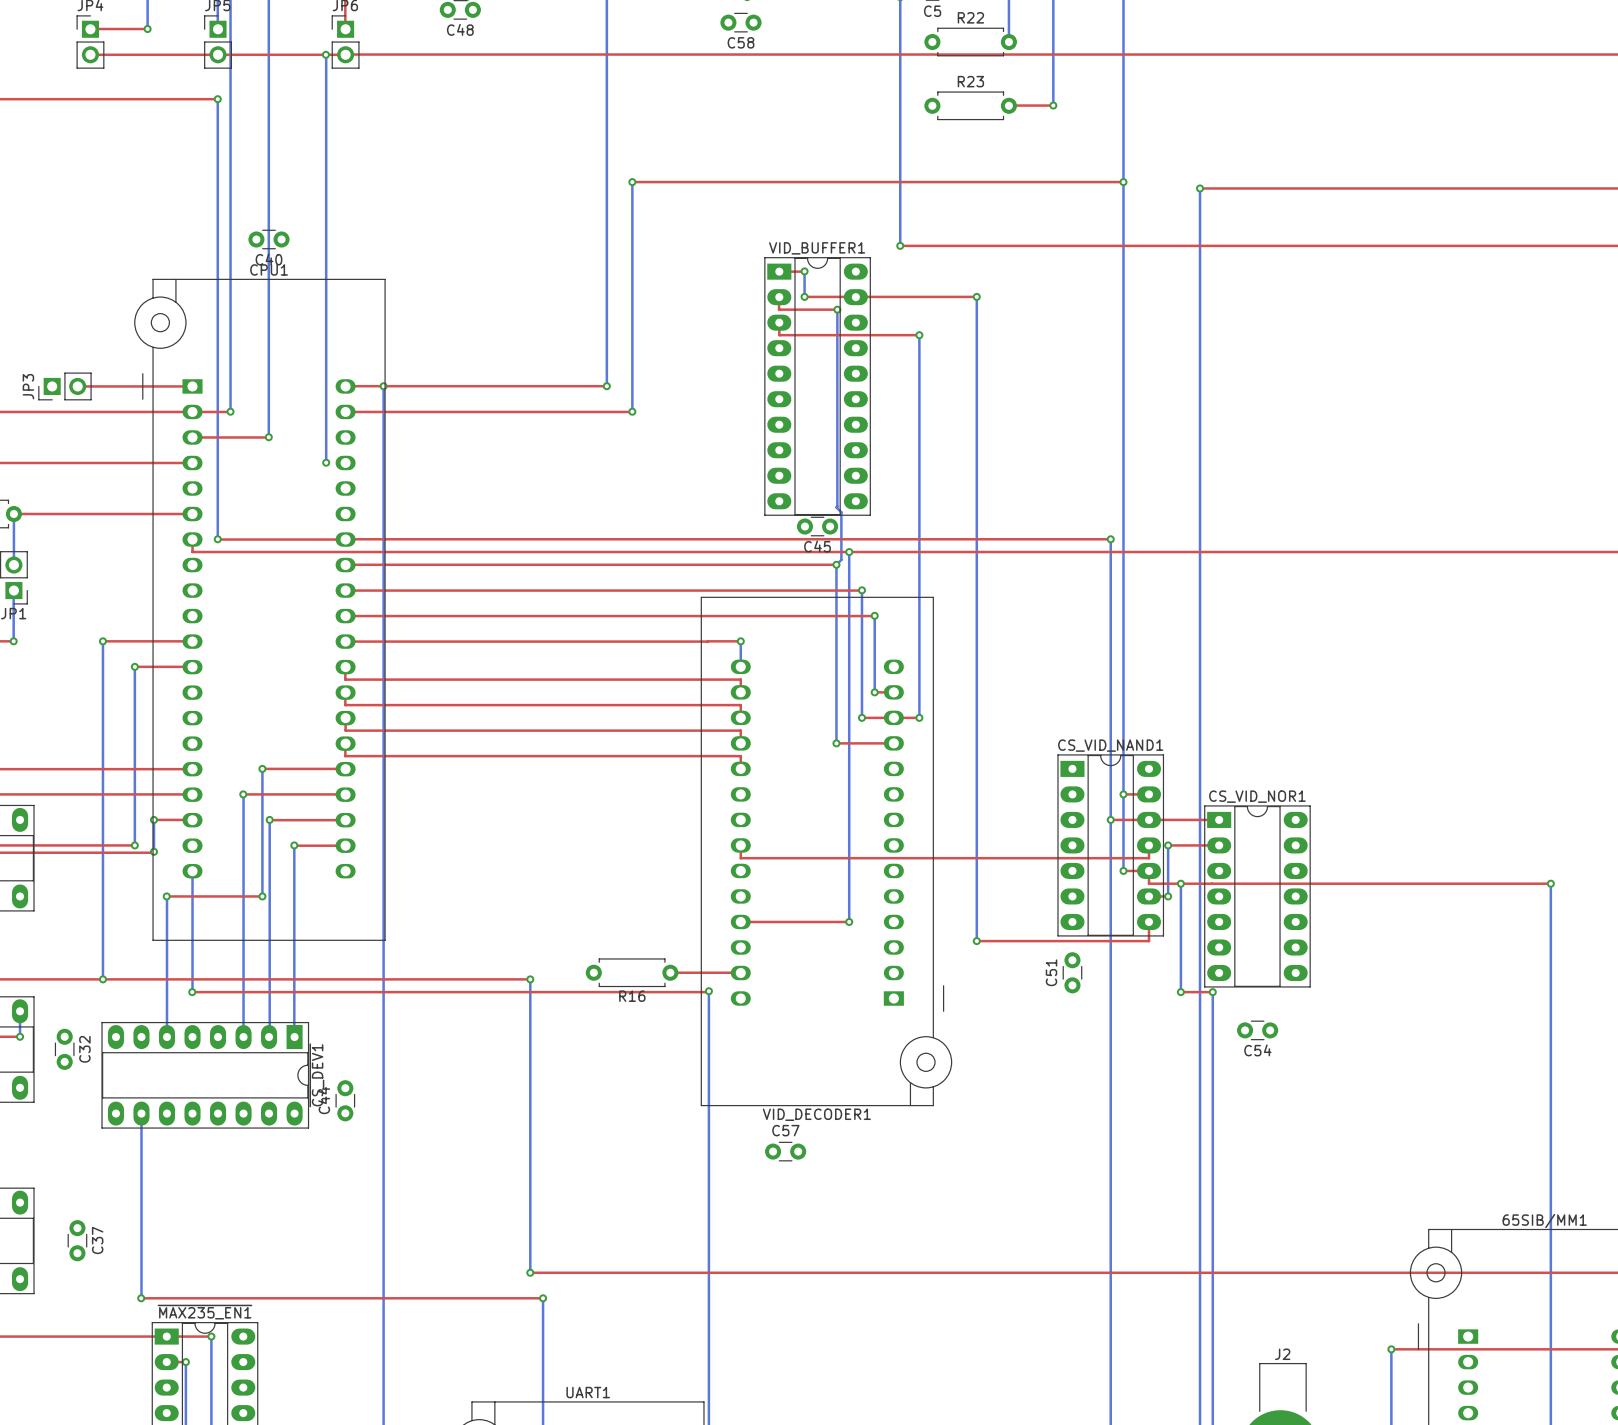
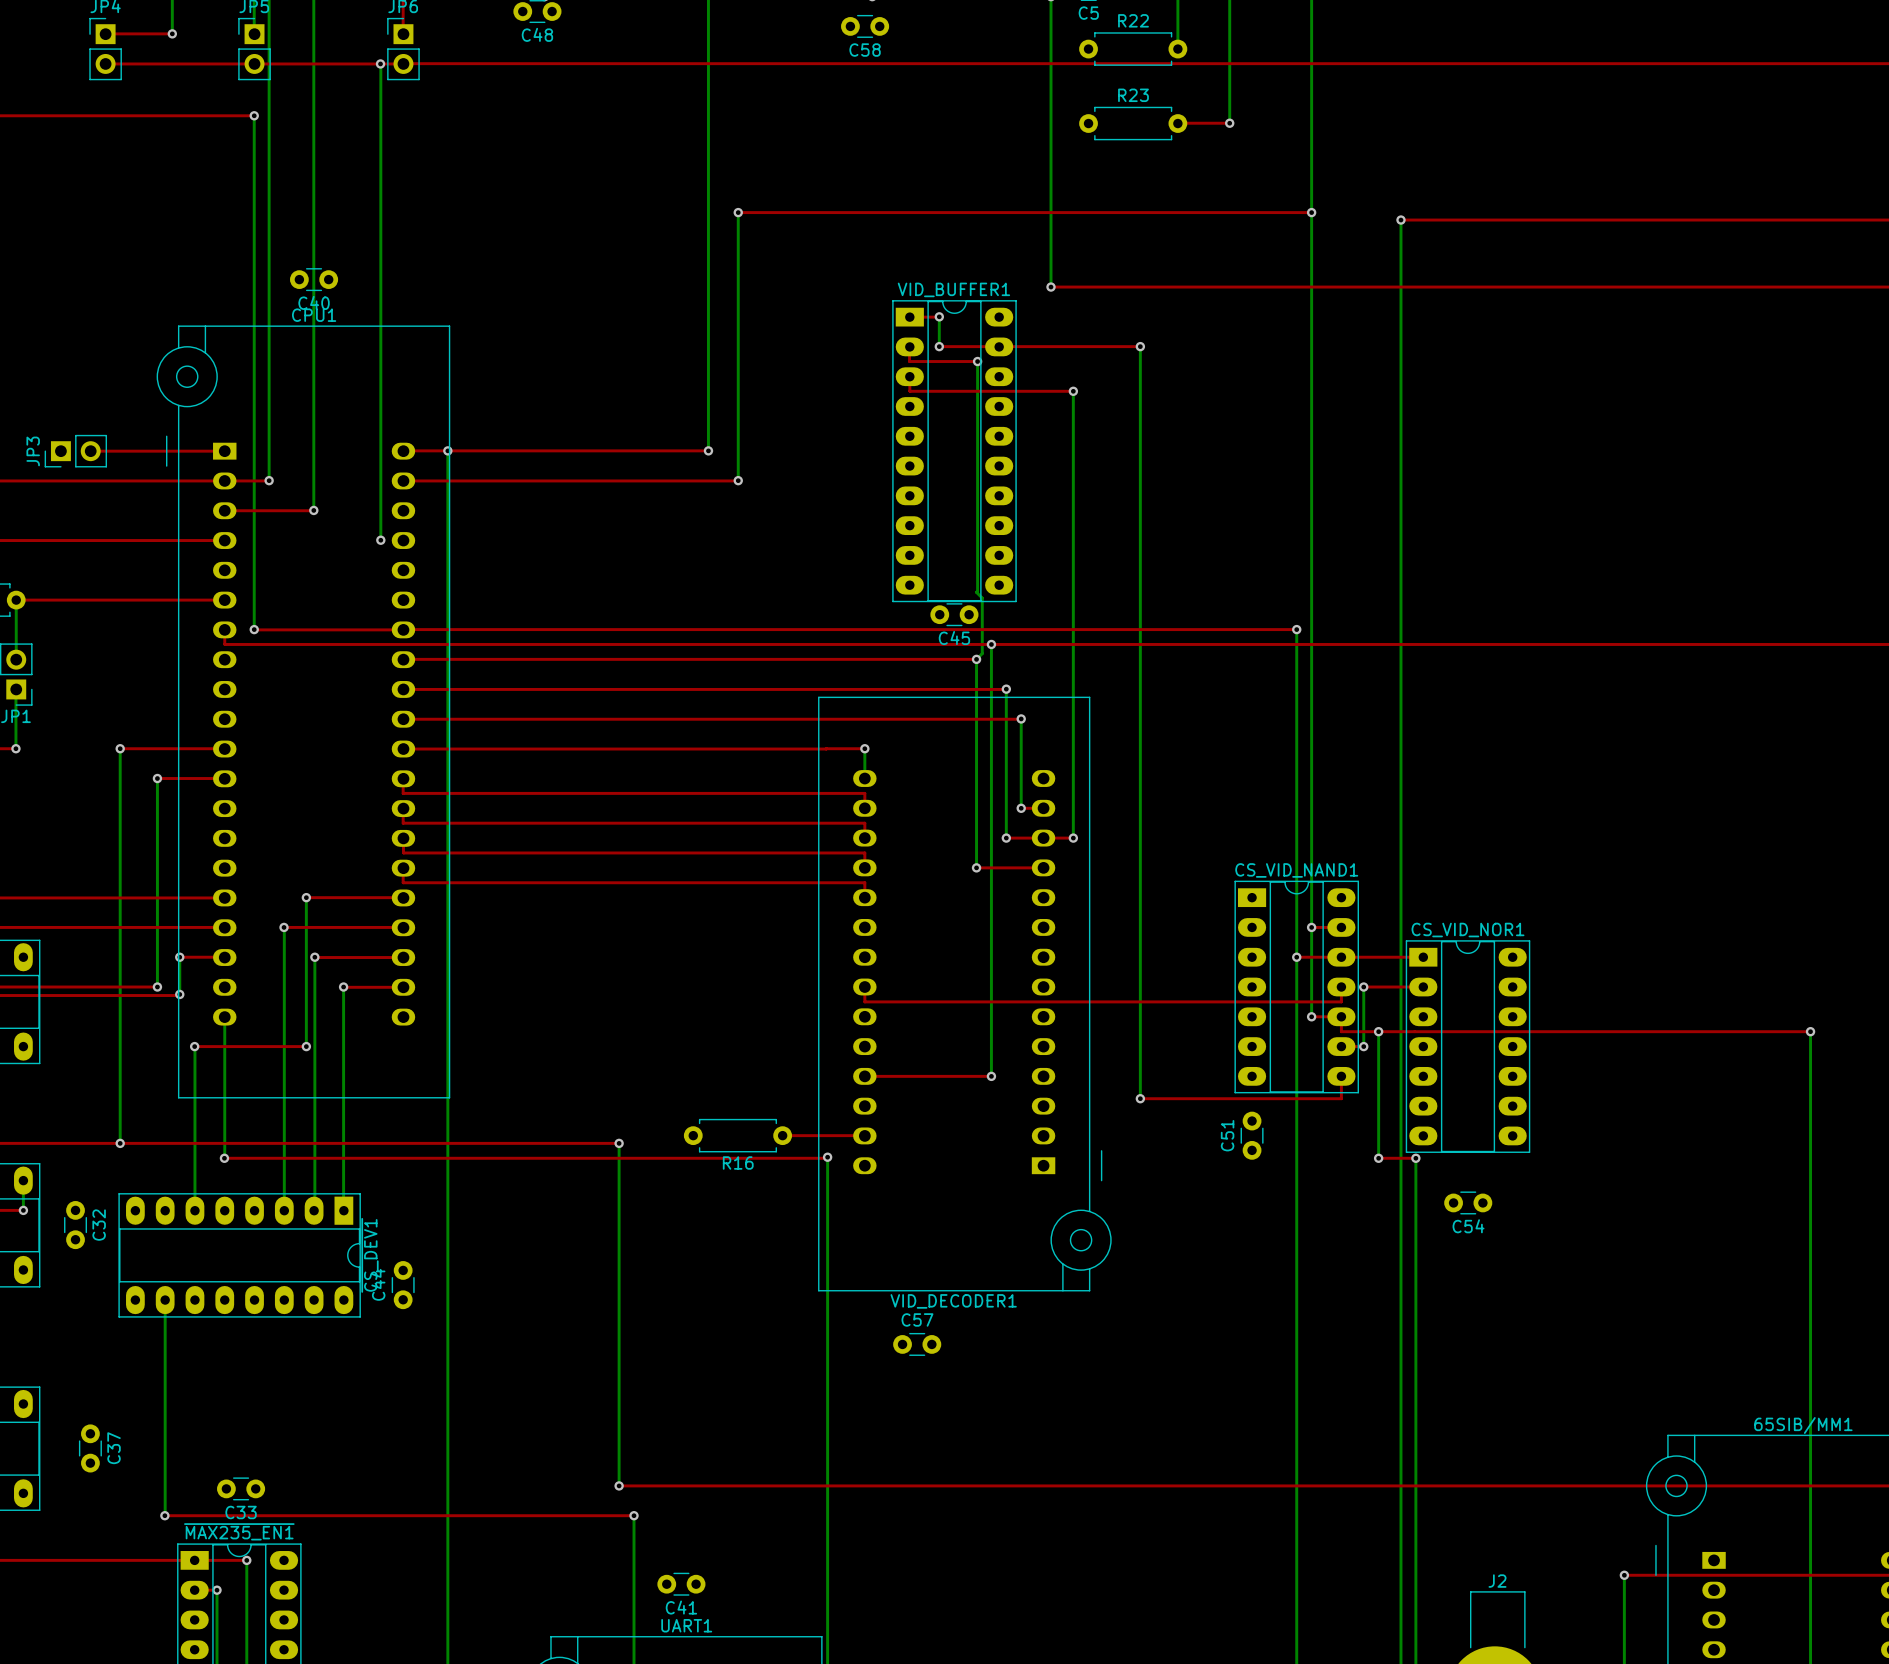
C33: none -> (241, 1488)
C41: none -> (681, 1584)

